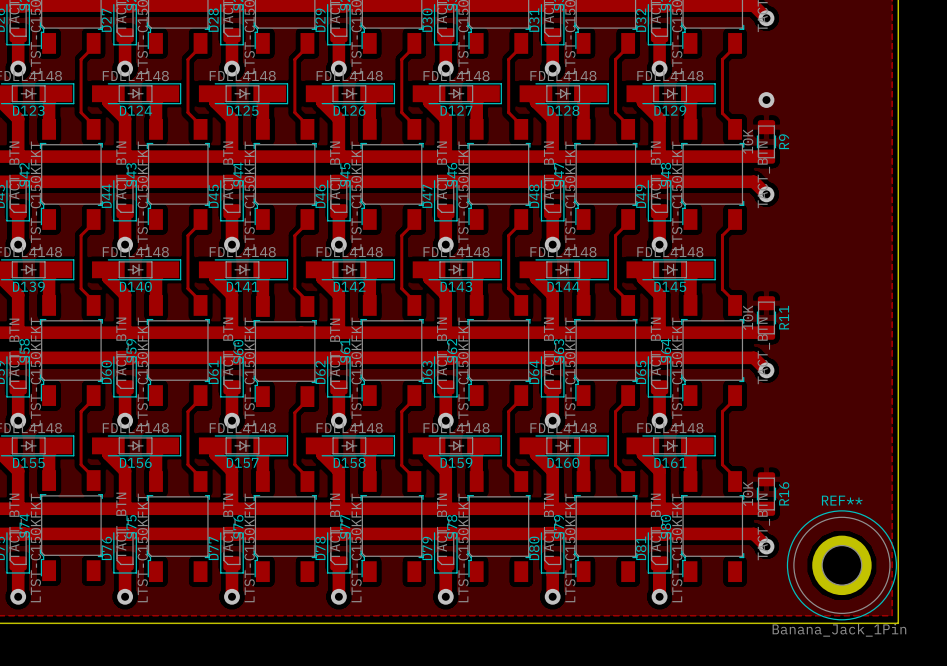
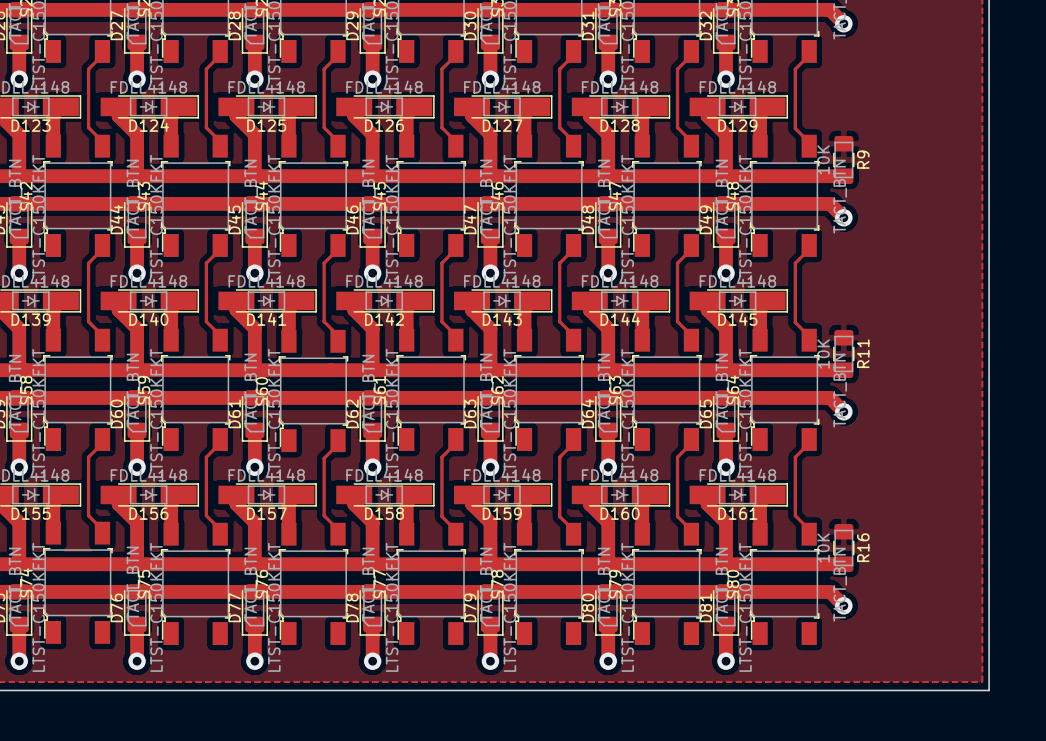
via: (766, 100) -> none
REF**: Banana_Jack_1Pin (841, 565) -> none

